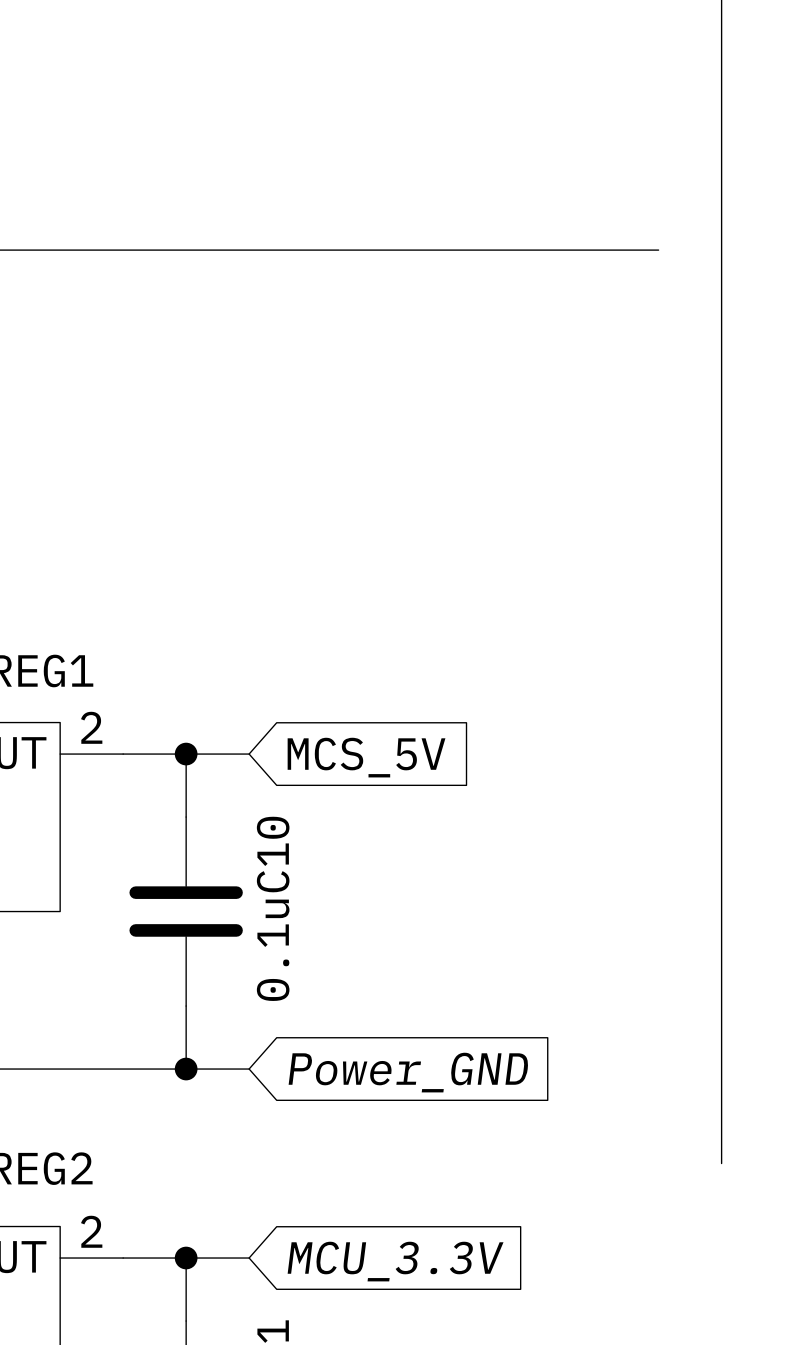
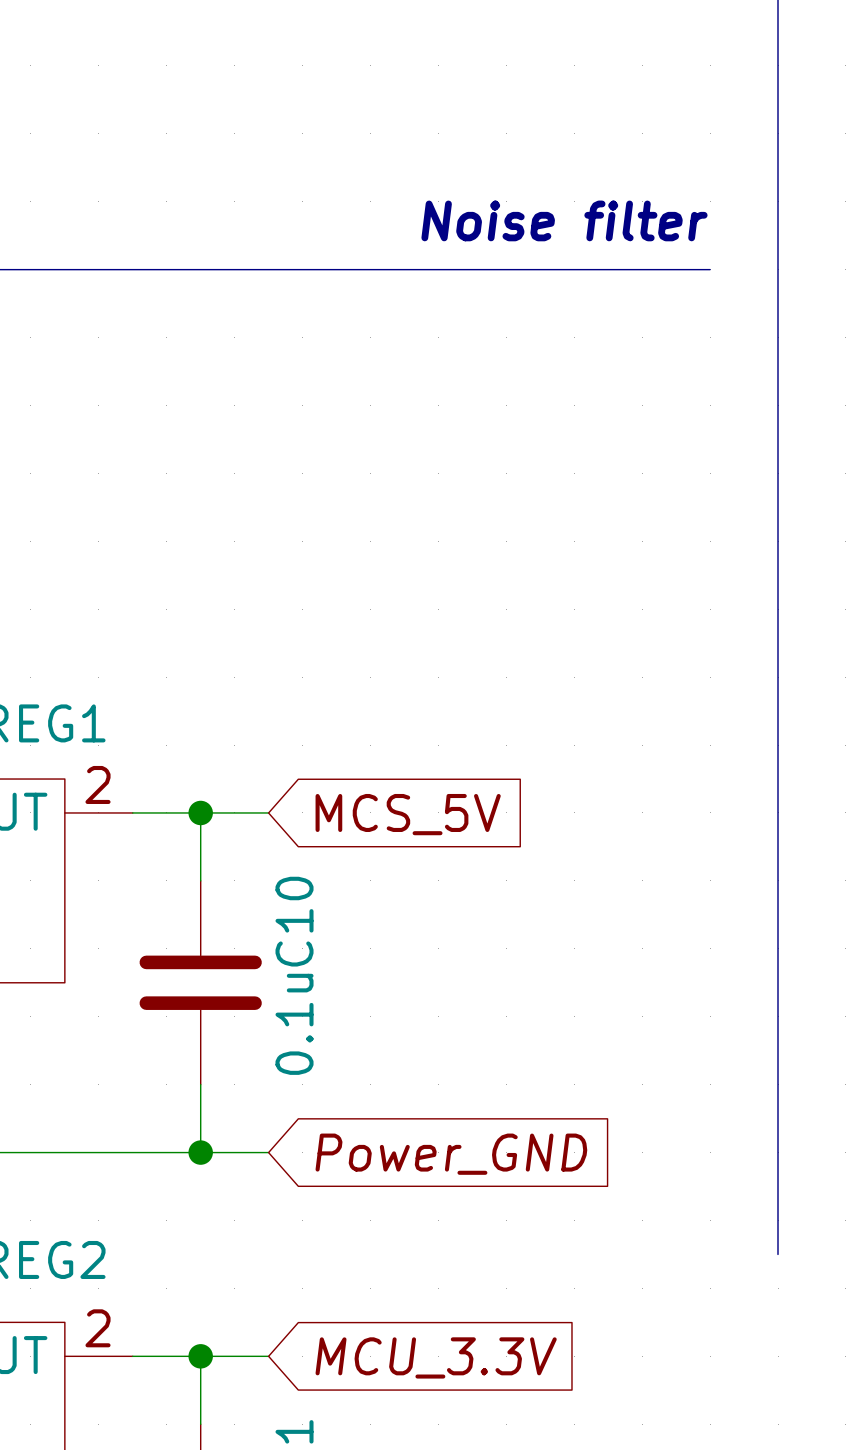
text: none -> Noise filter (564, 220)

